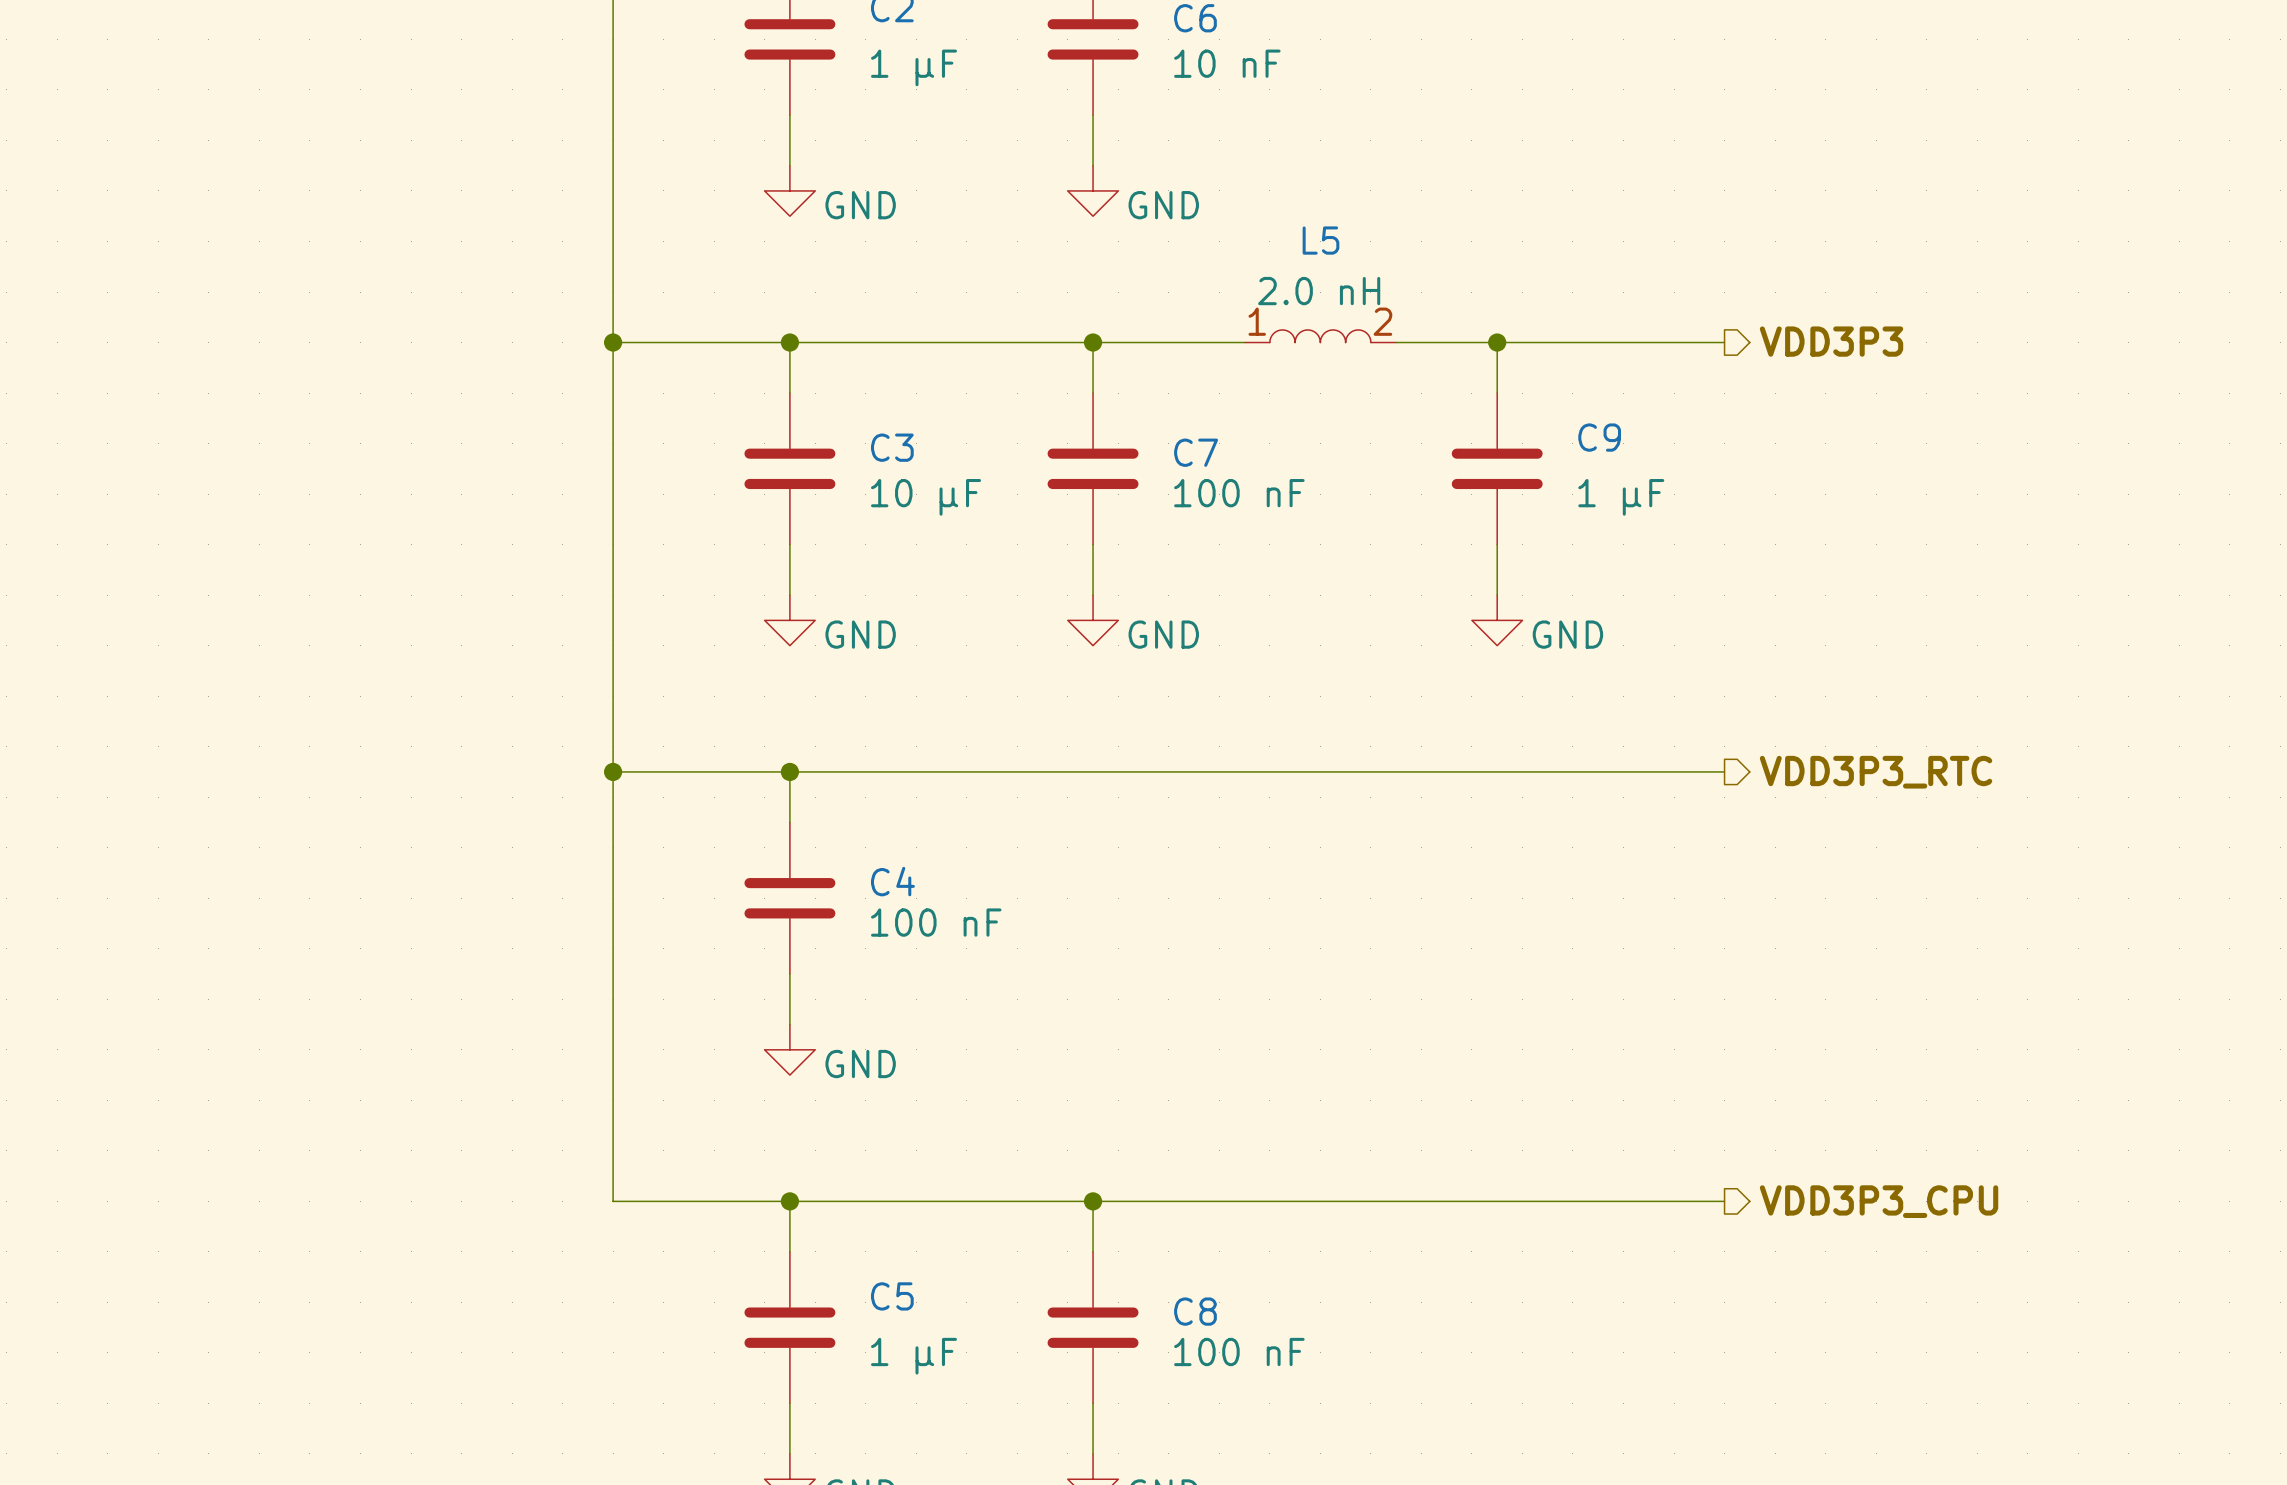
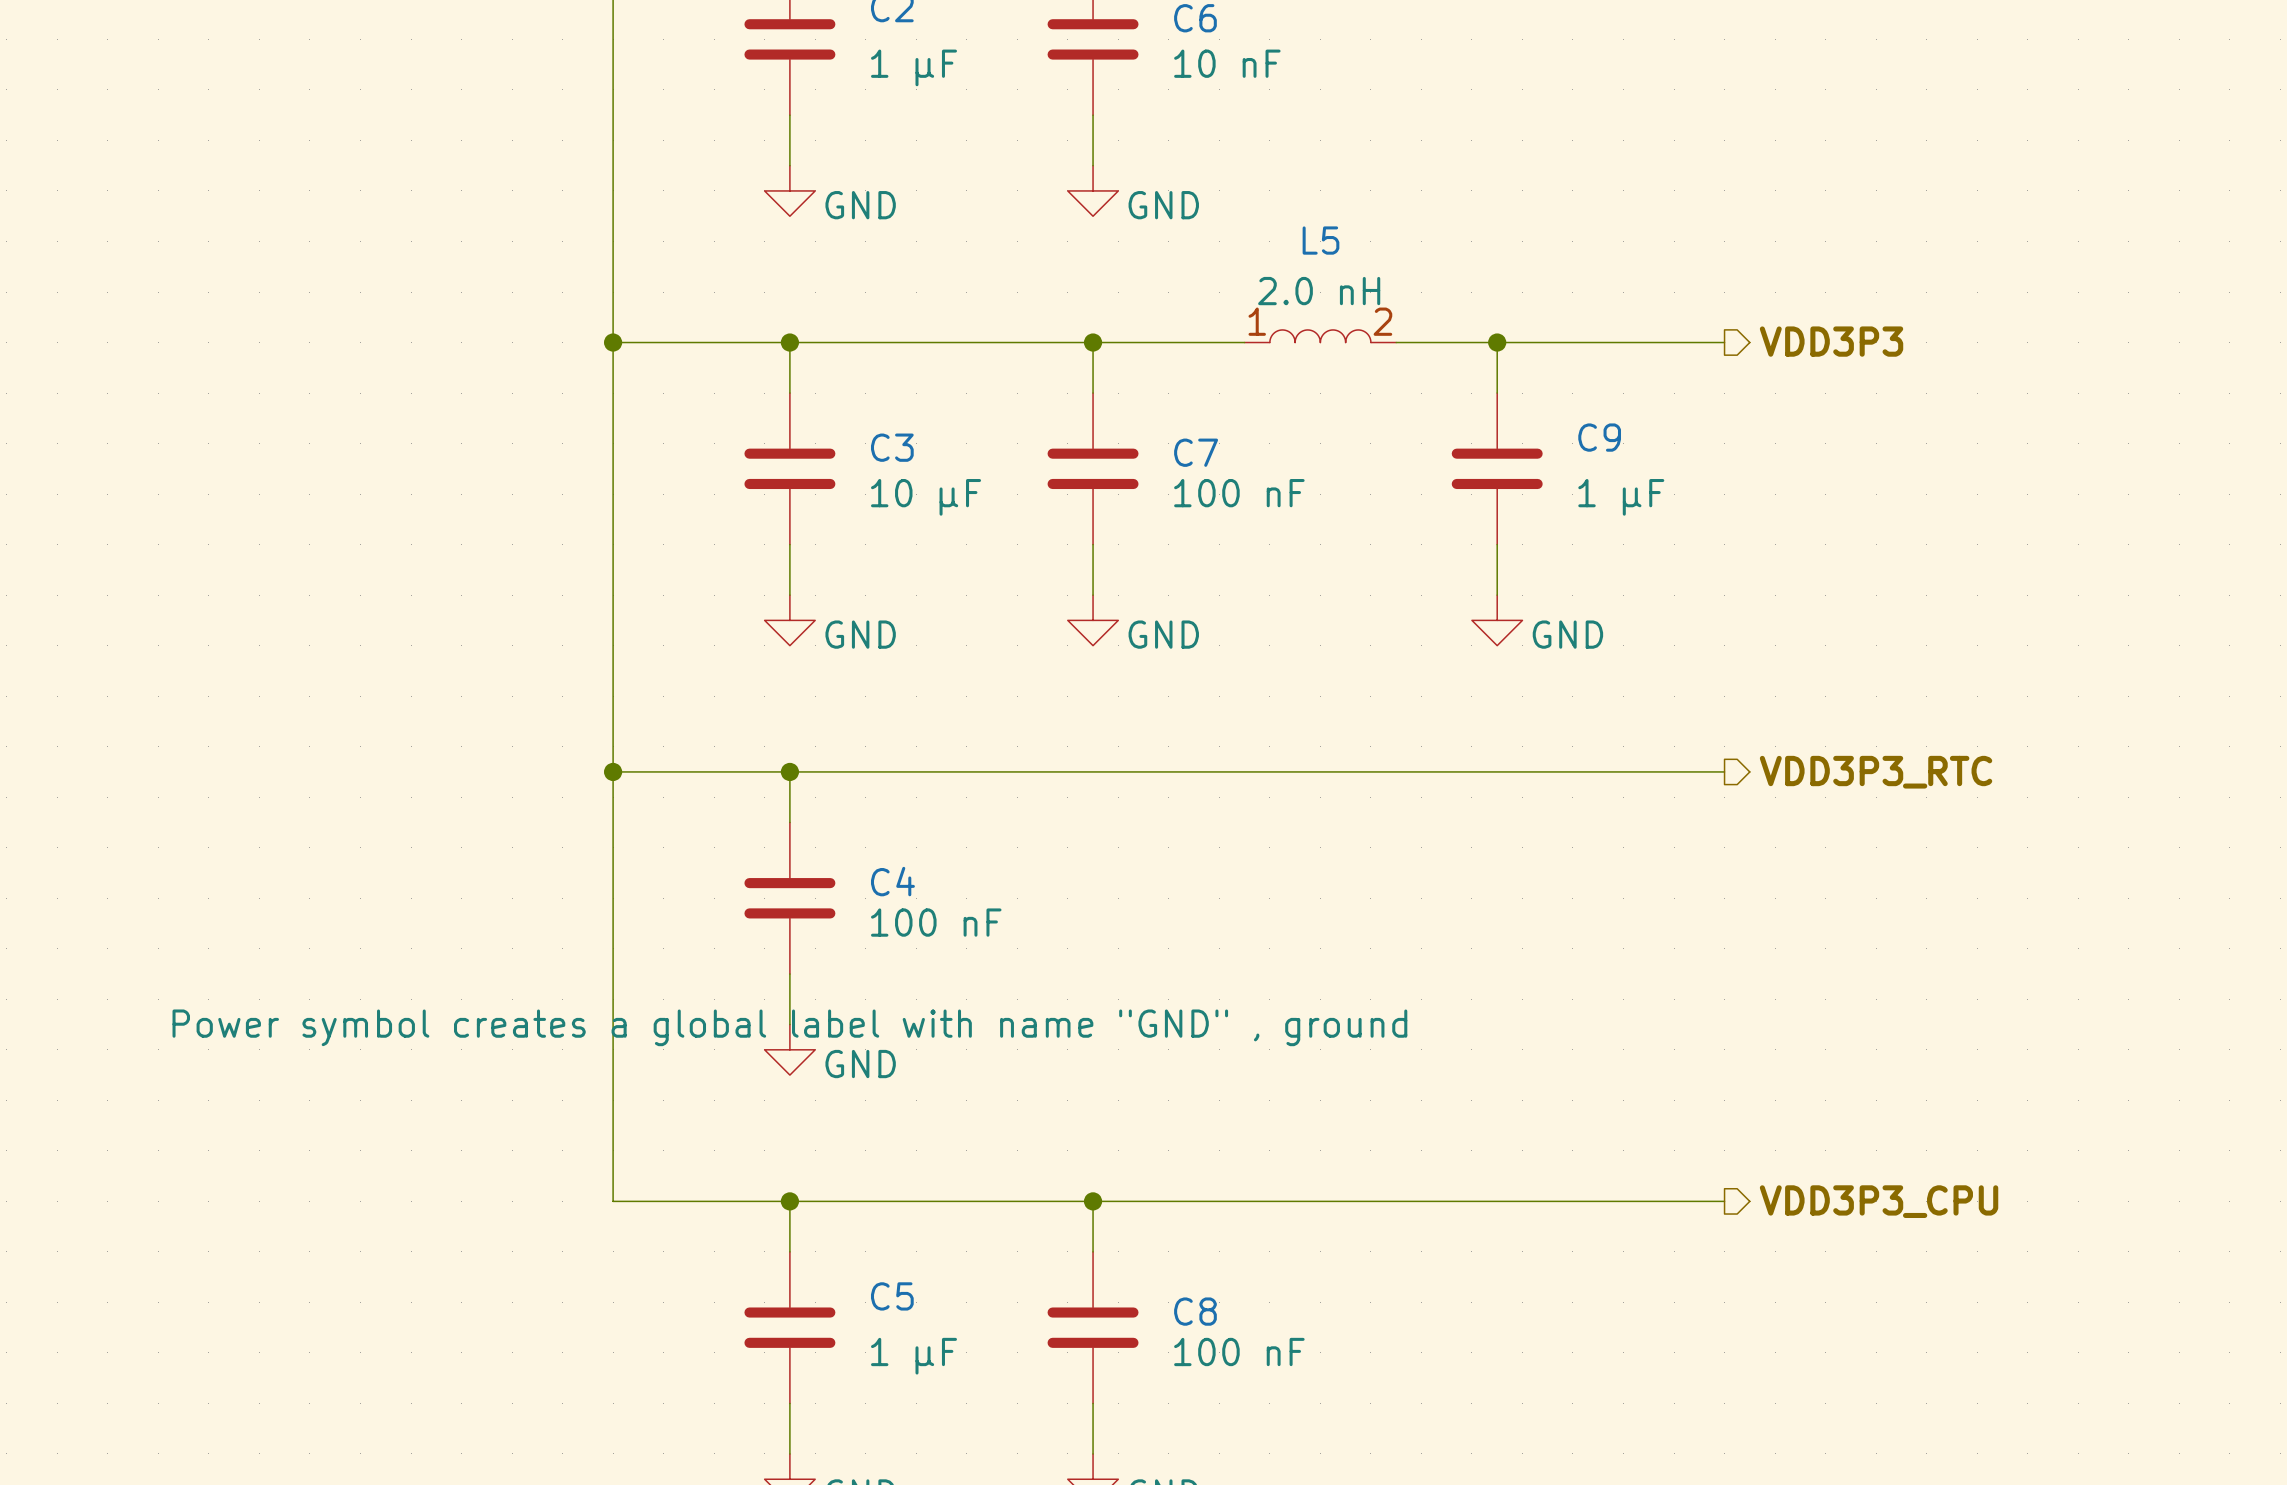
power symbol text: none -> Power symbol creates a global label with name "GND" , ground (789, 1027)

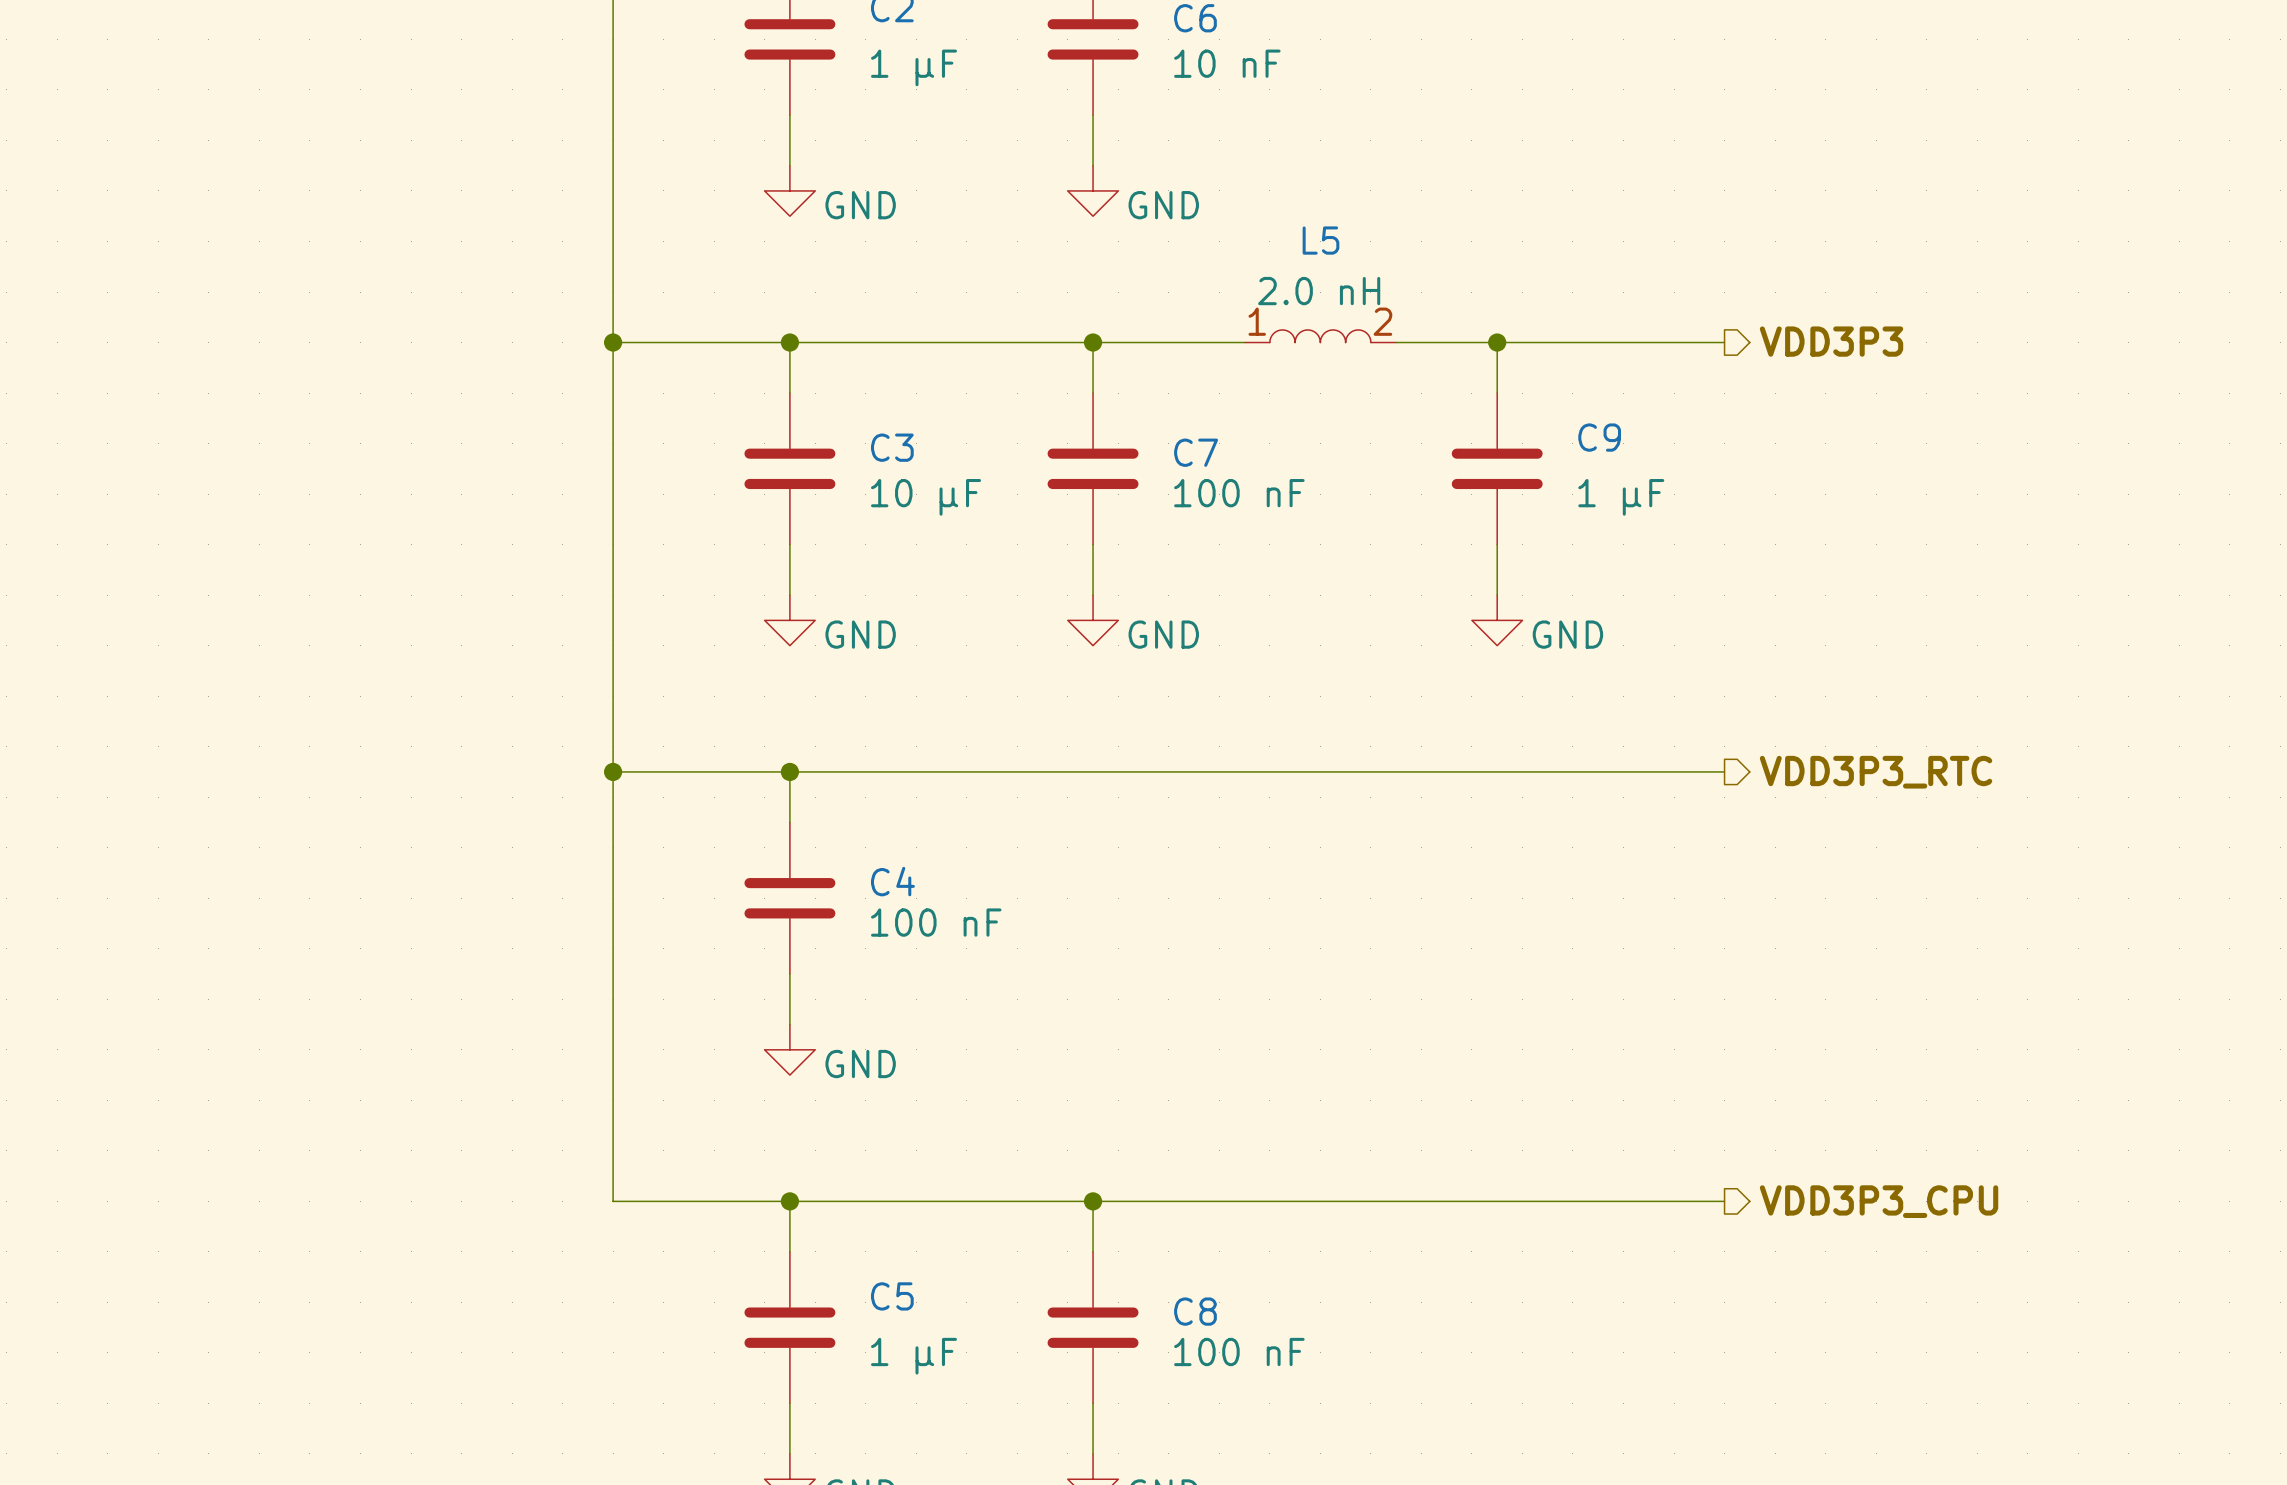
power symbol text: Power symbol creates a global label with name "GND" , ground (789, 1027) -> none

